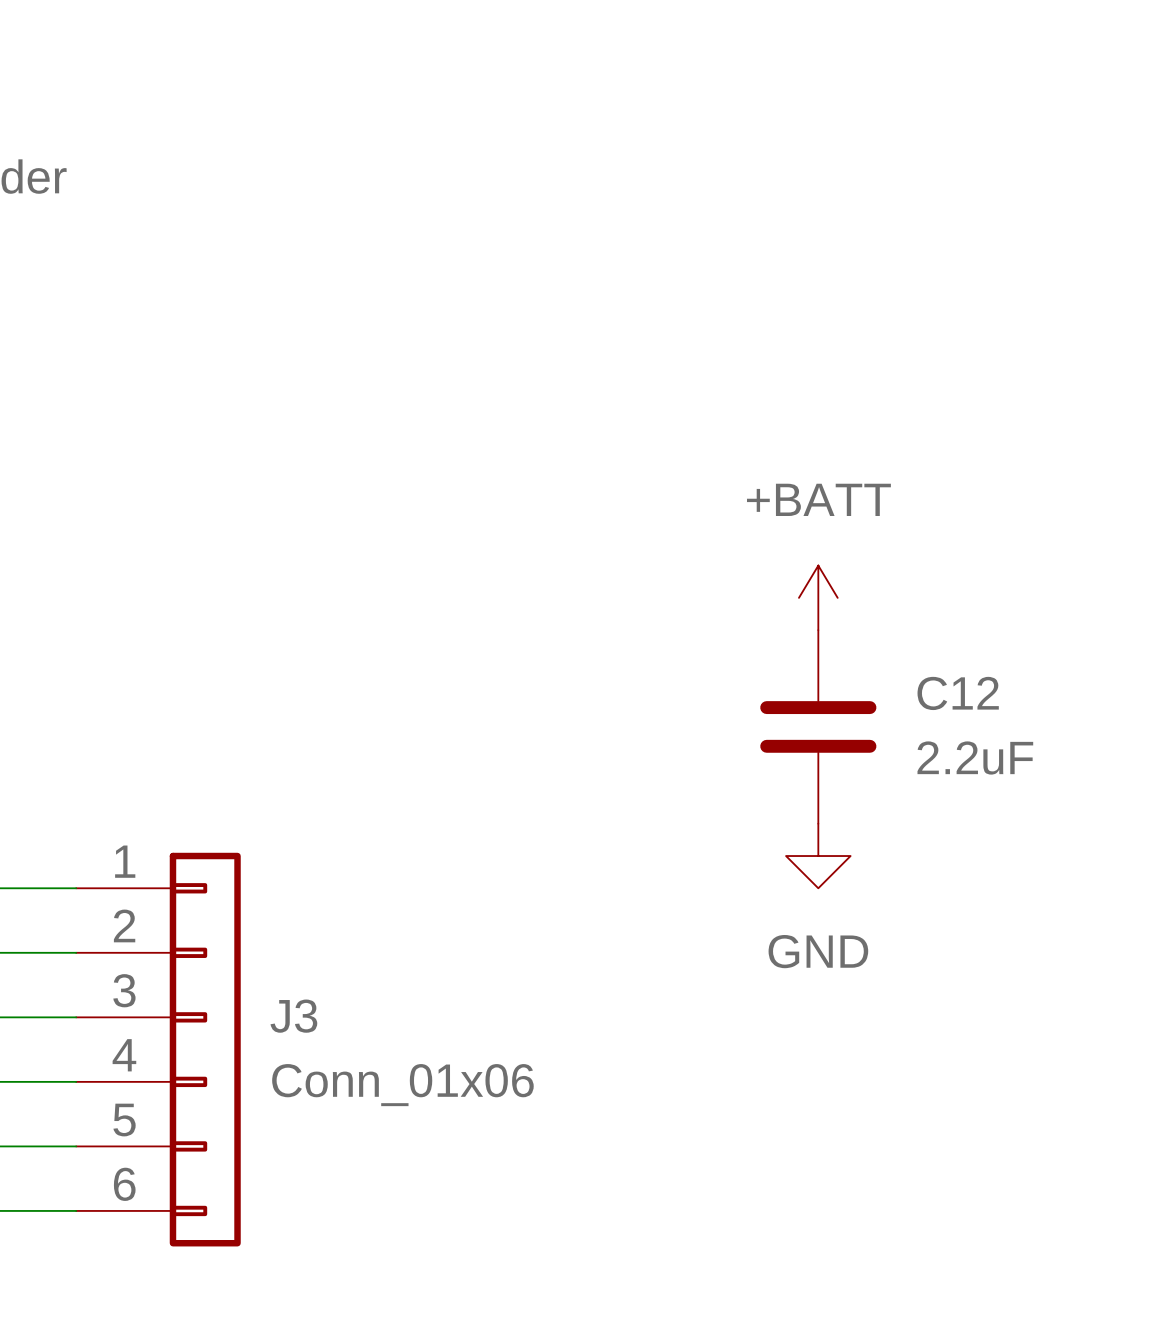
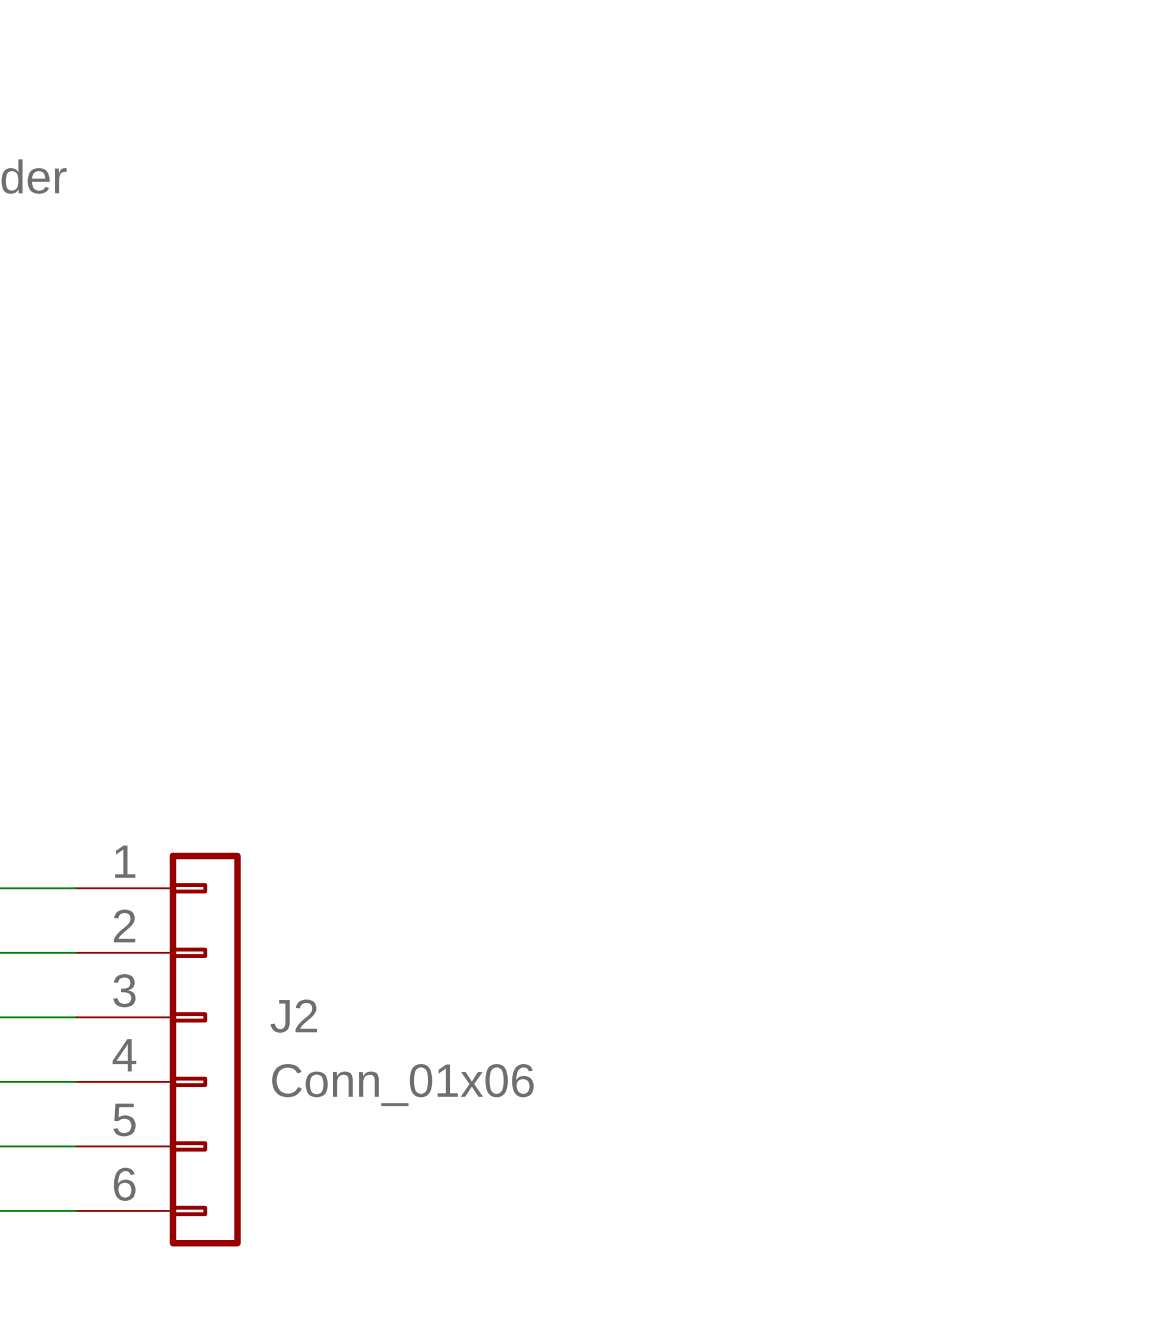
power symbol: +BATT (818, 597) -> none
C12: 2.2uF (818, 726) -> none
power symbol: GND (818, 856) -> none
J3 name: J3 (293, 1016) -> J2 (293, 1016)

